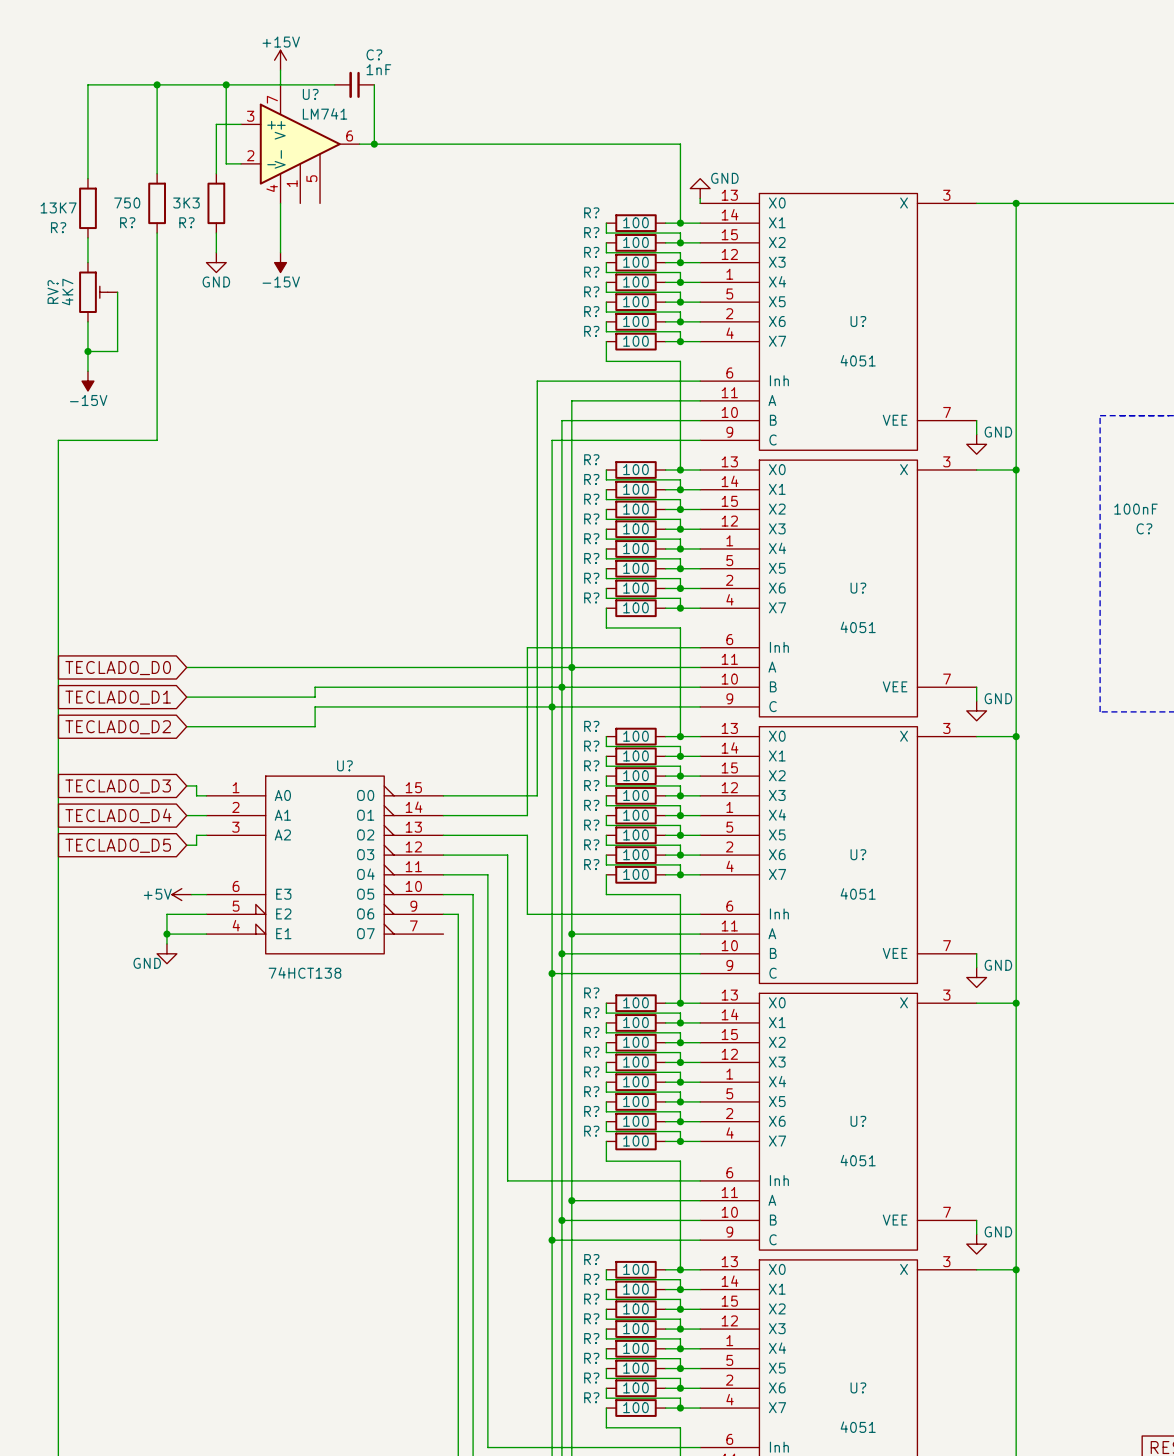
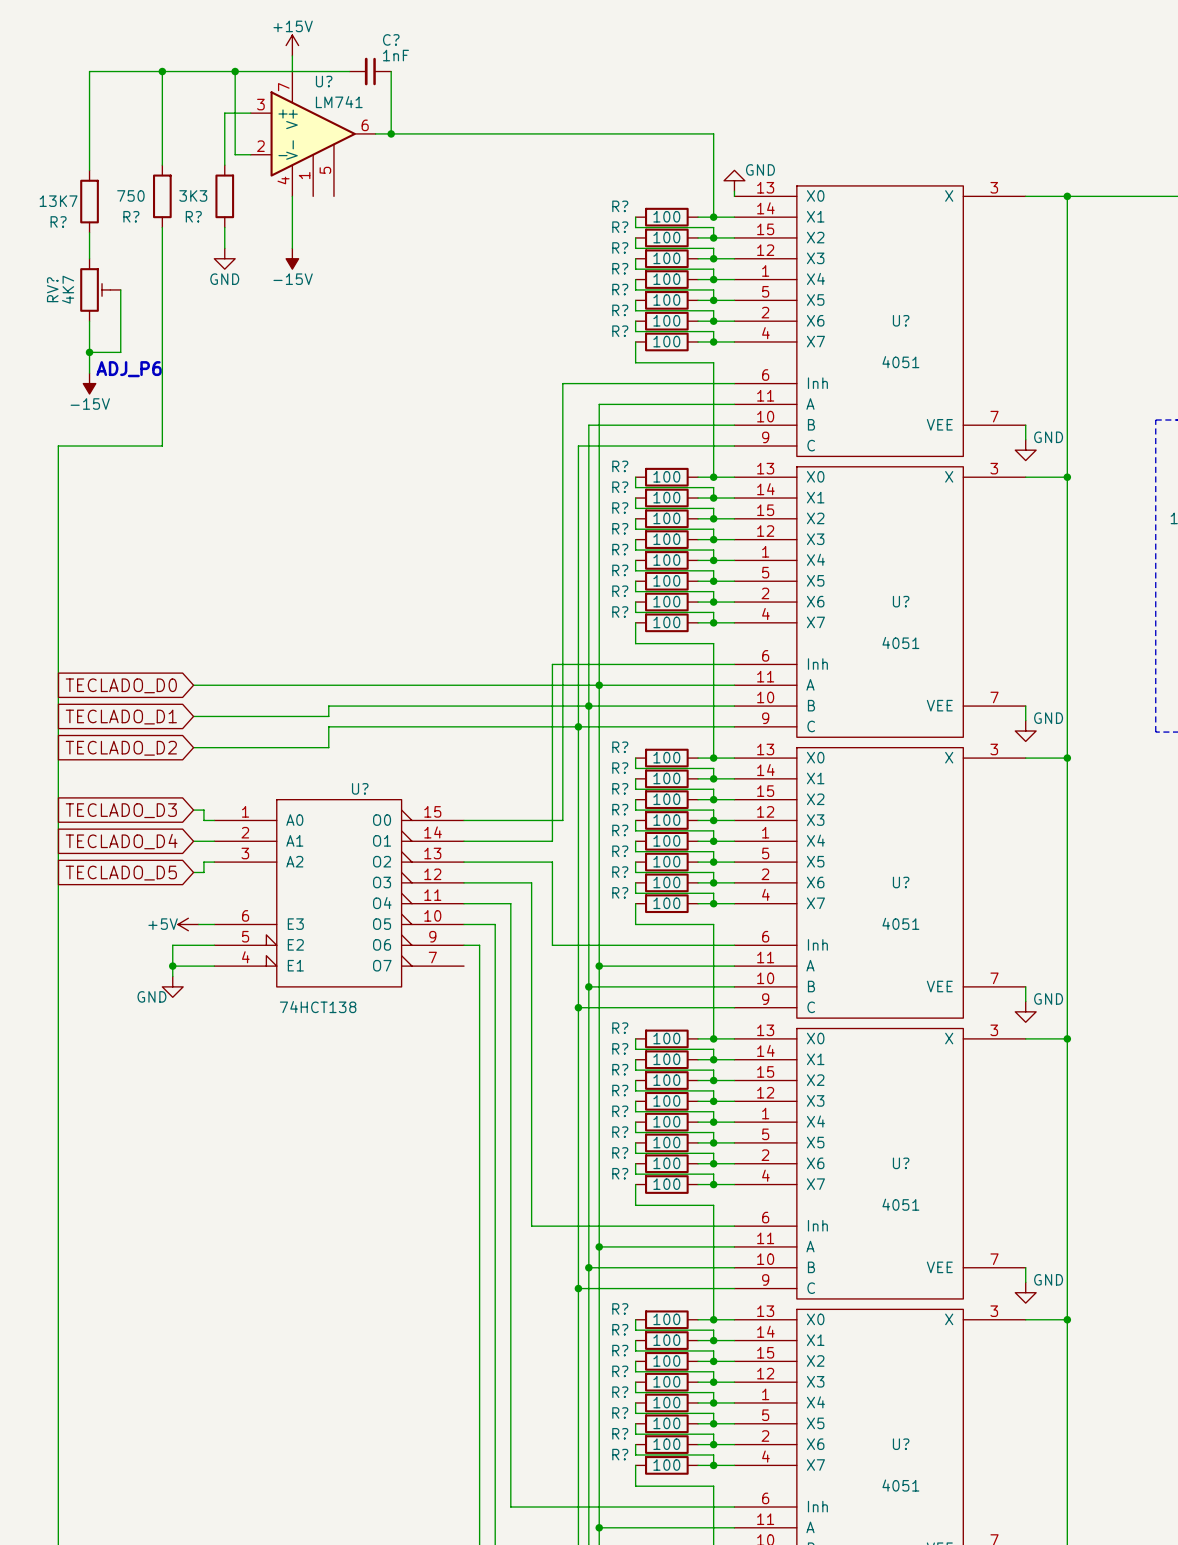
text: none -> ADJ_P6 (129, 369)

